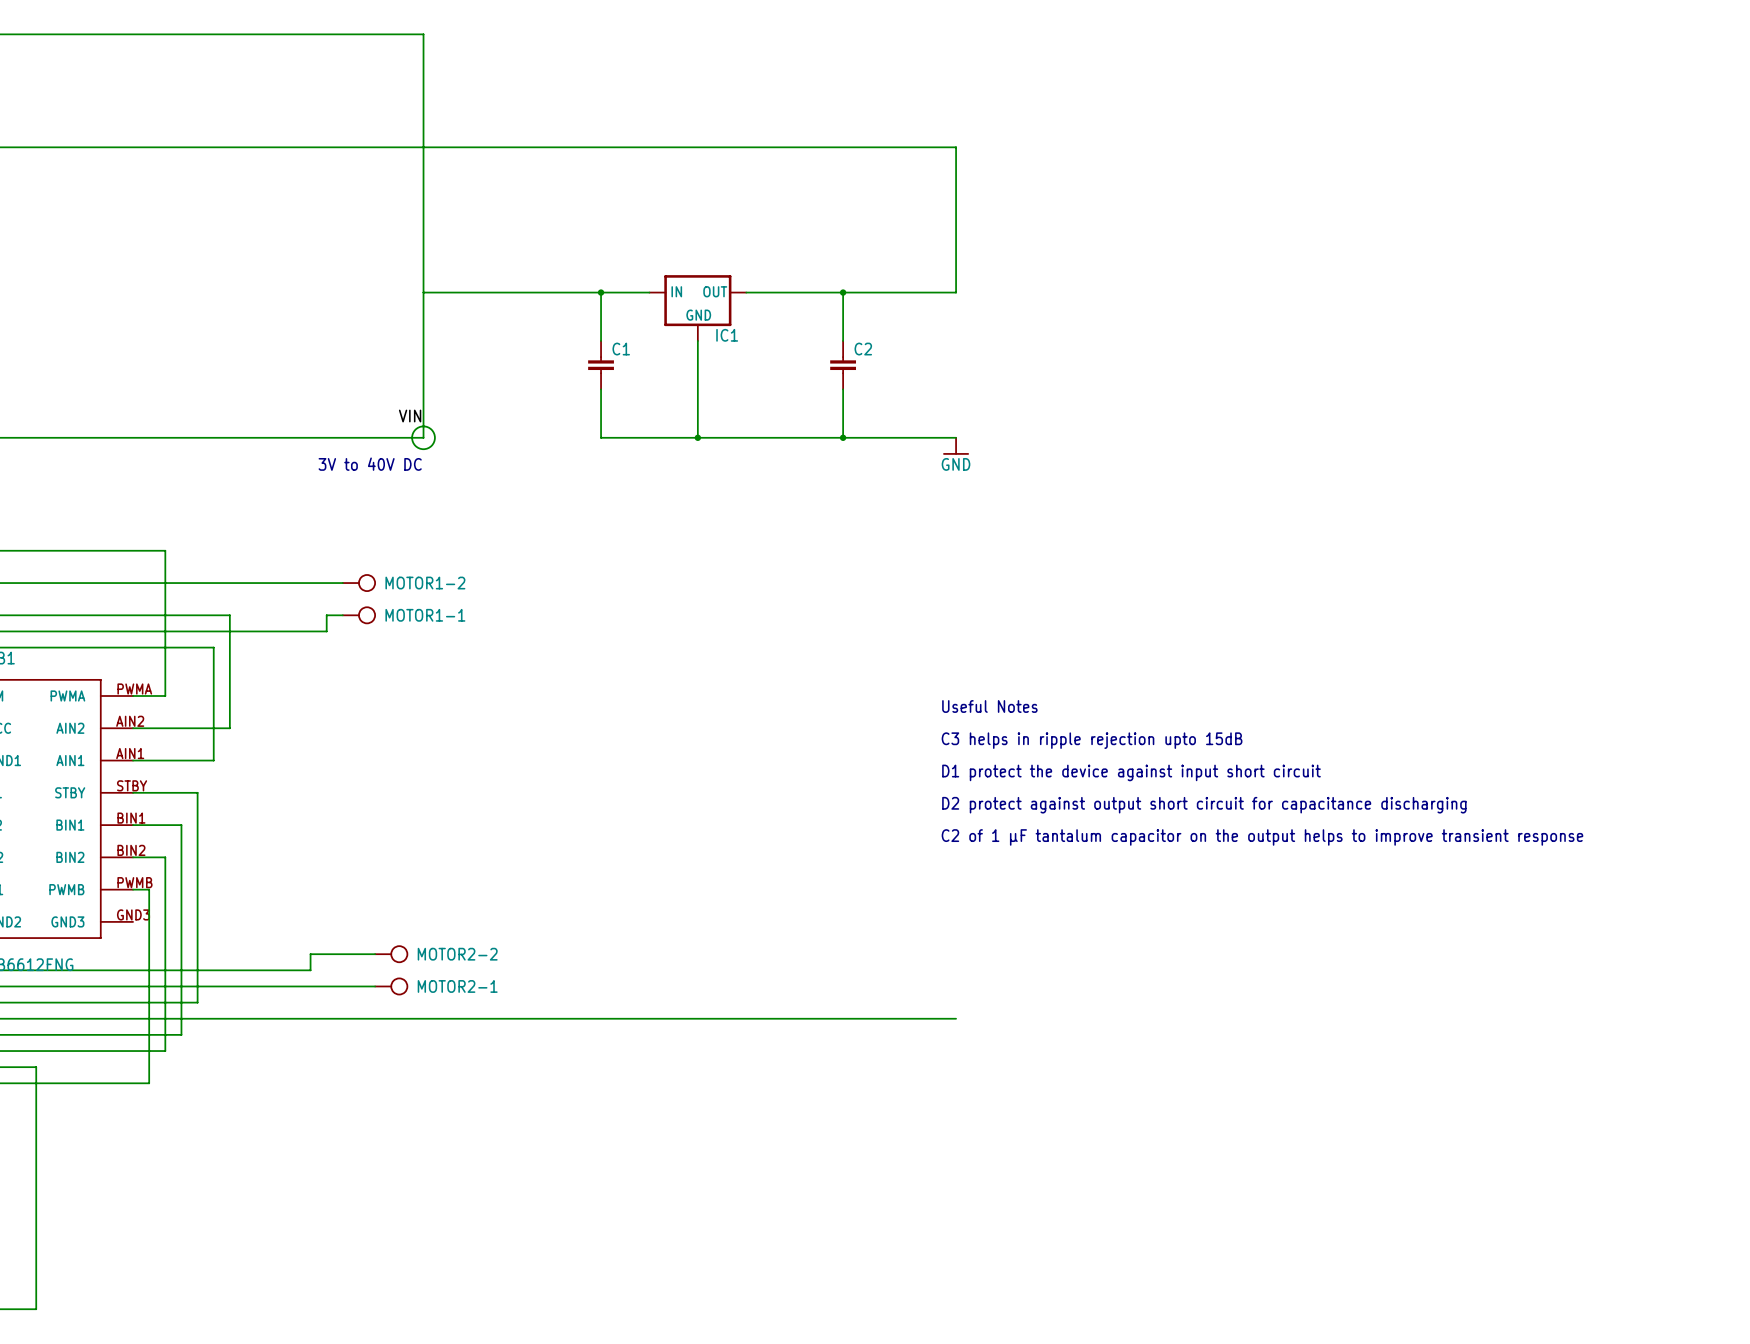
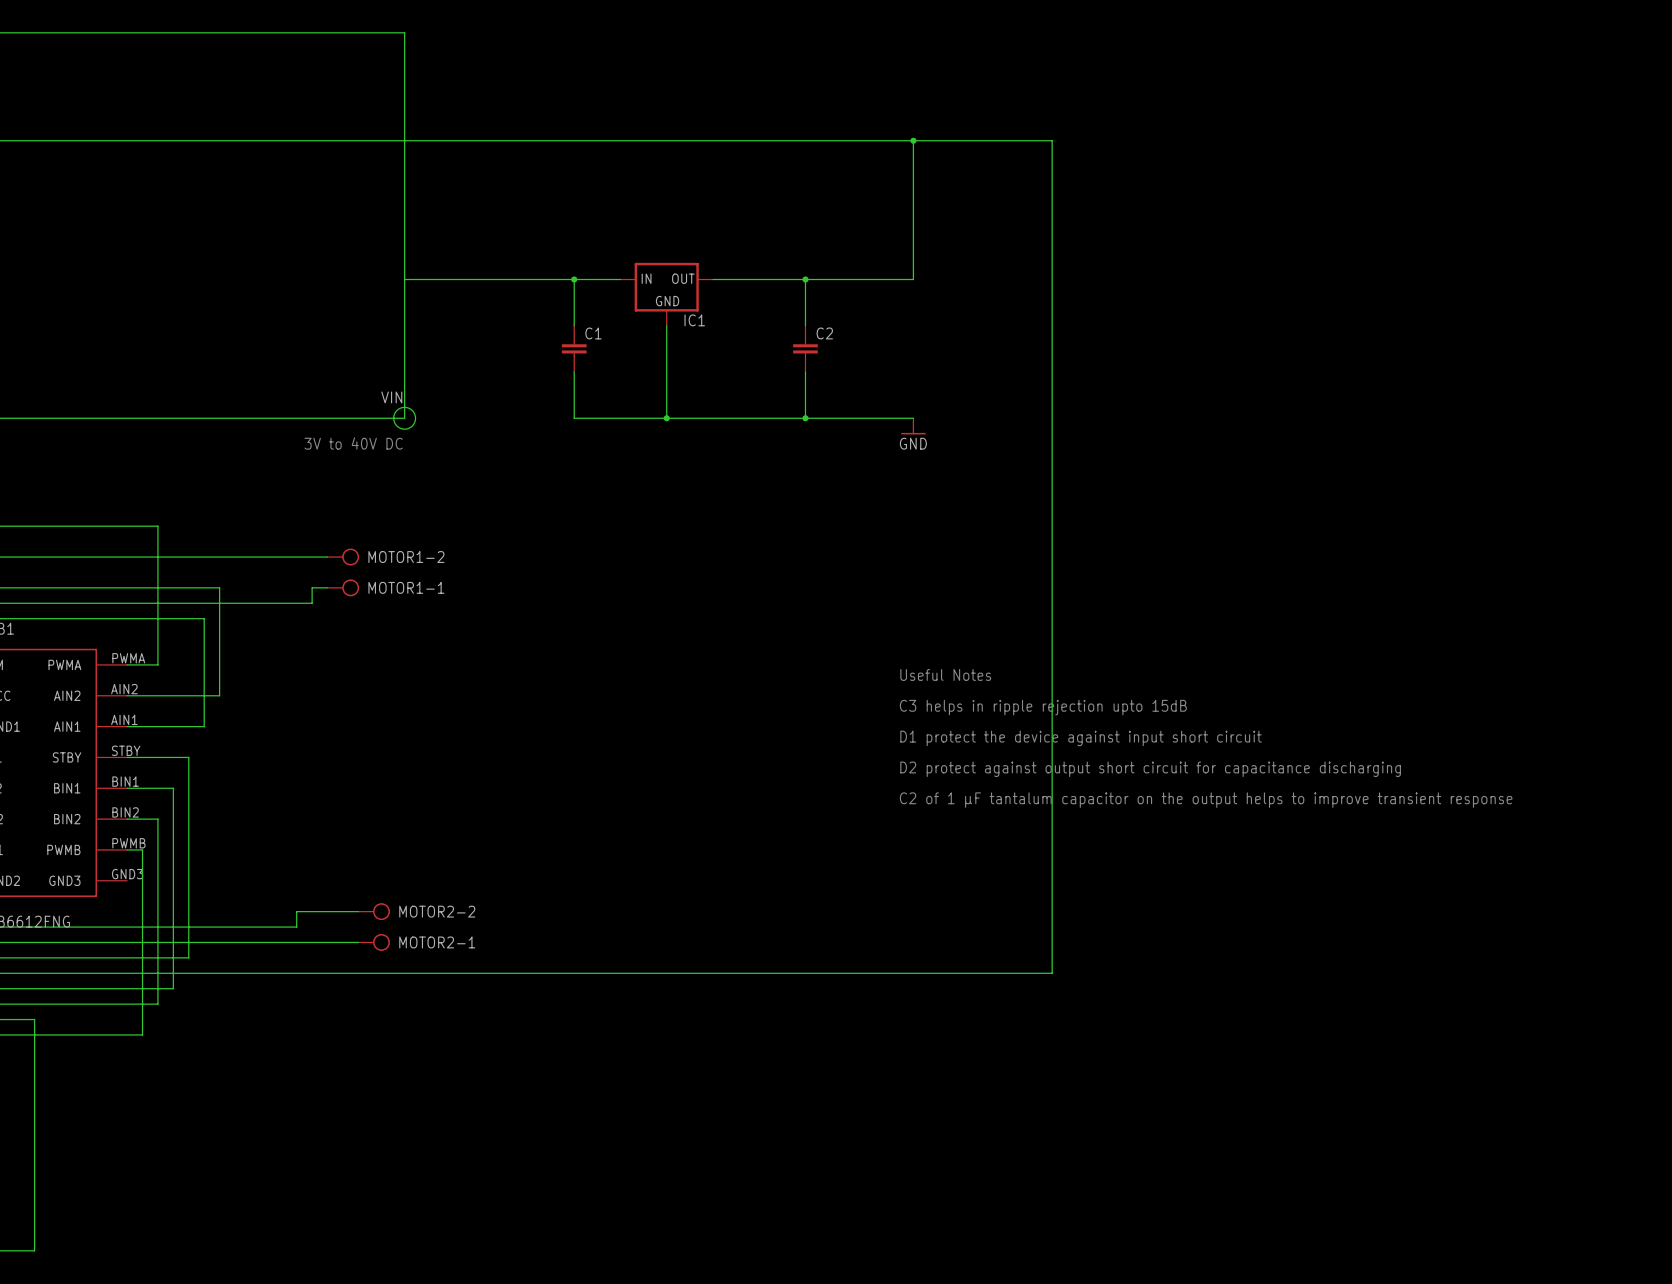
wire: none -> (913, 140) (1052, 140) (1052, 973) (913, 973)
junction: none -> (913, 140)

